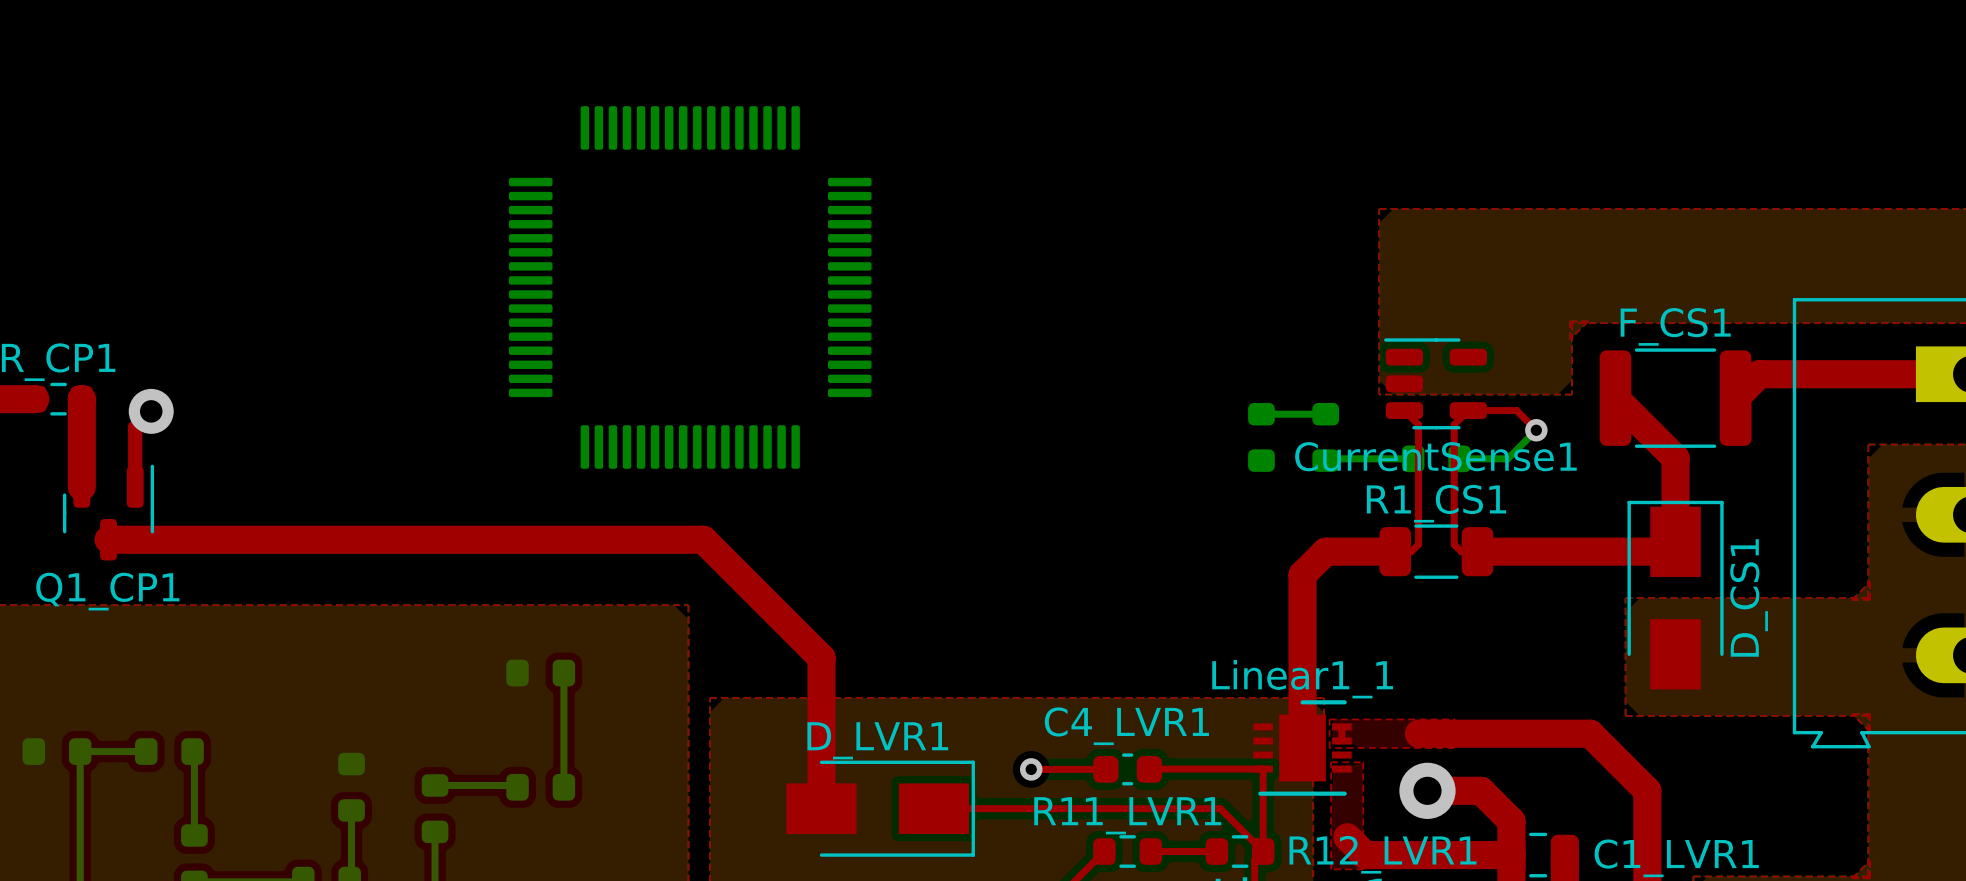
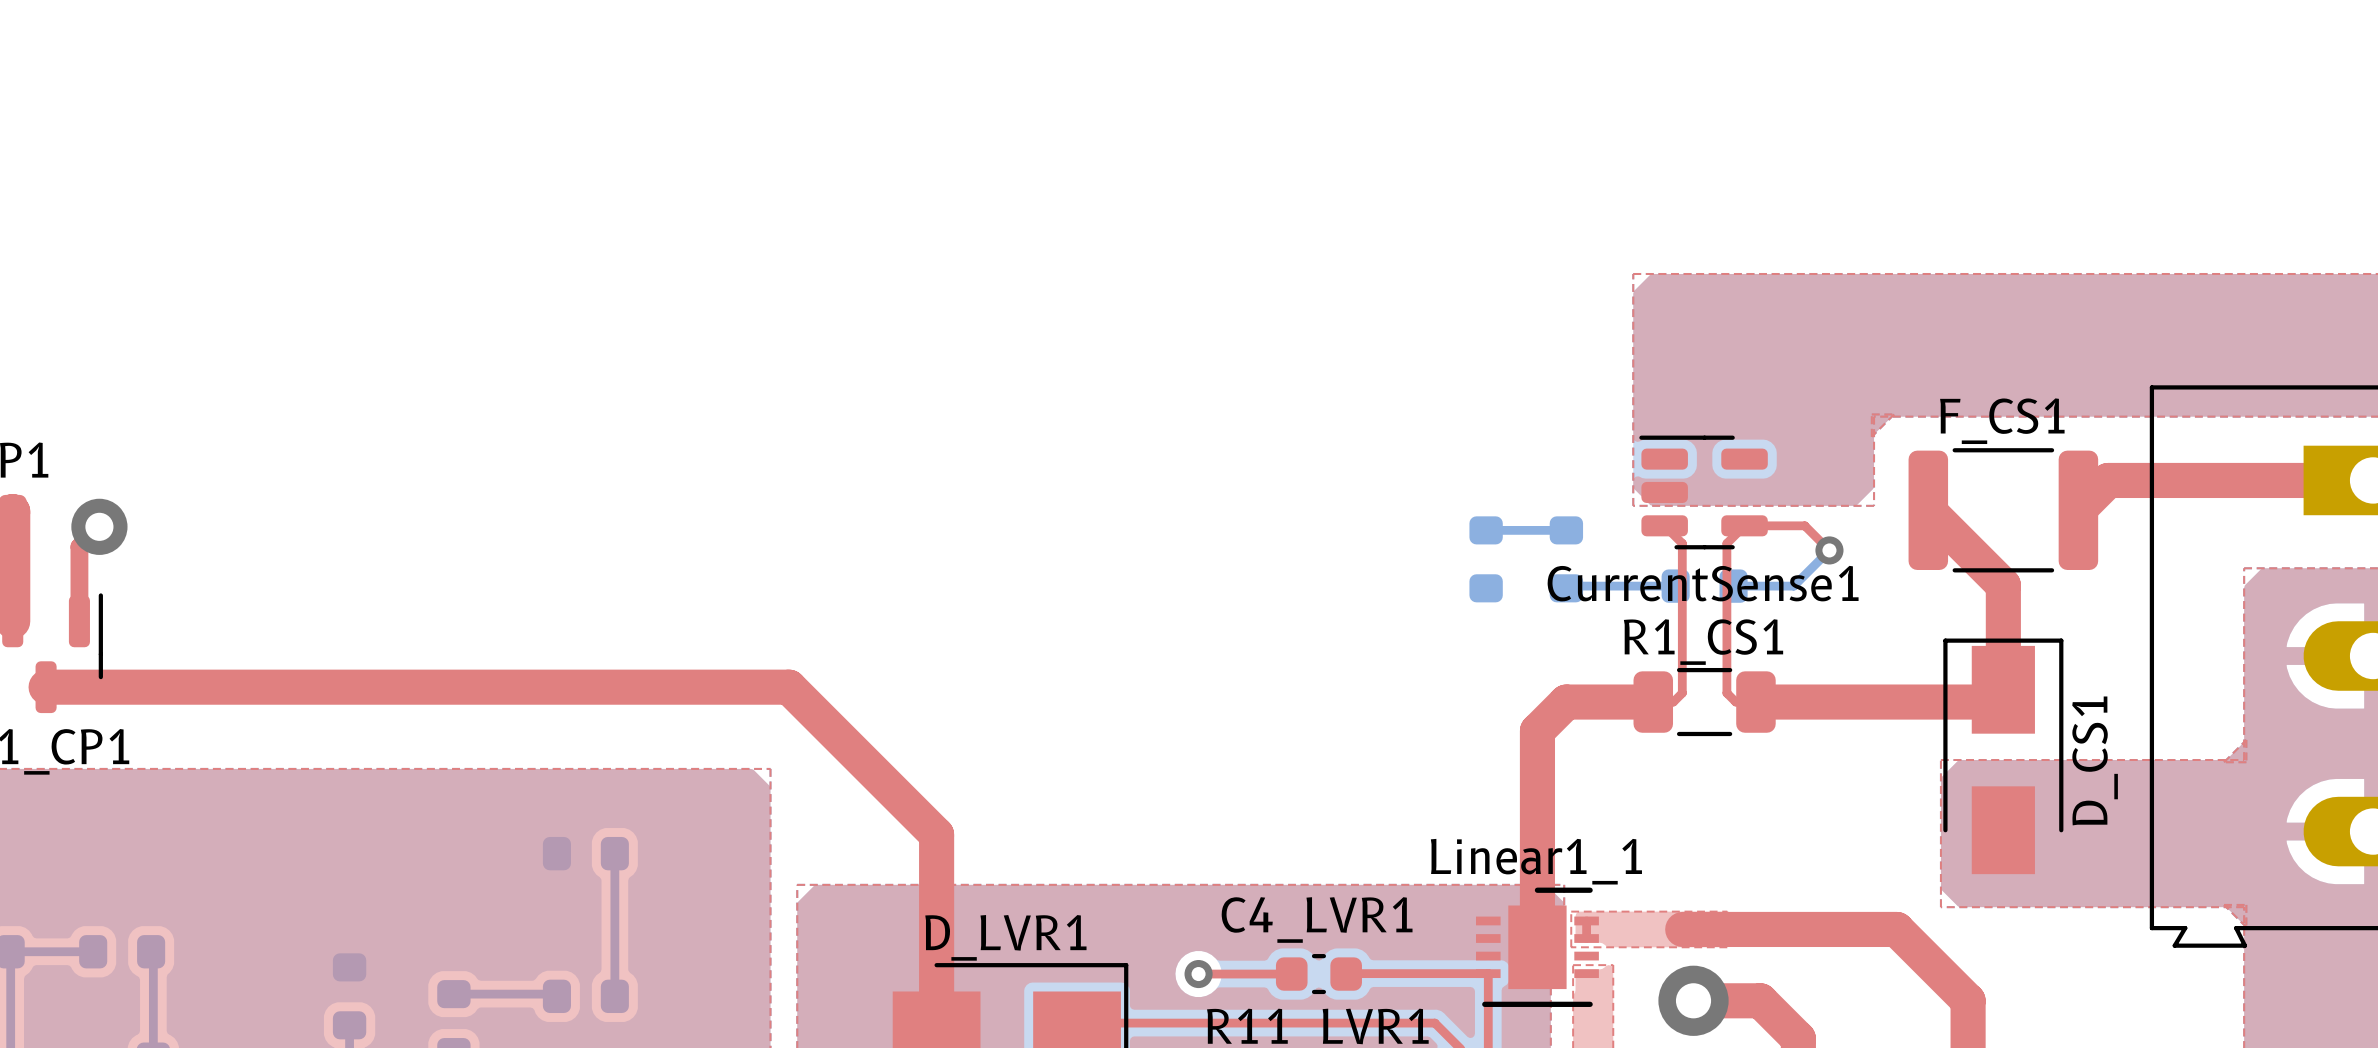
part: (690, 287) -> none

